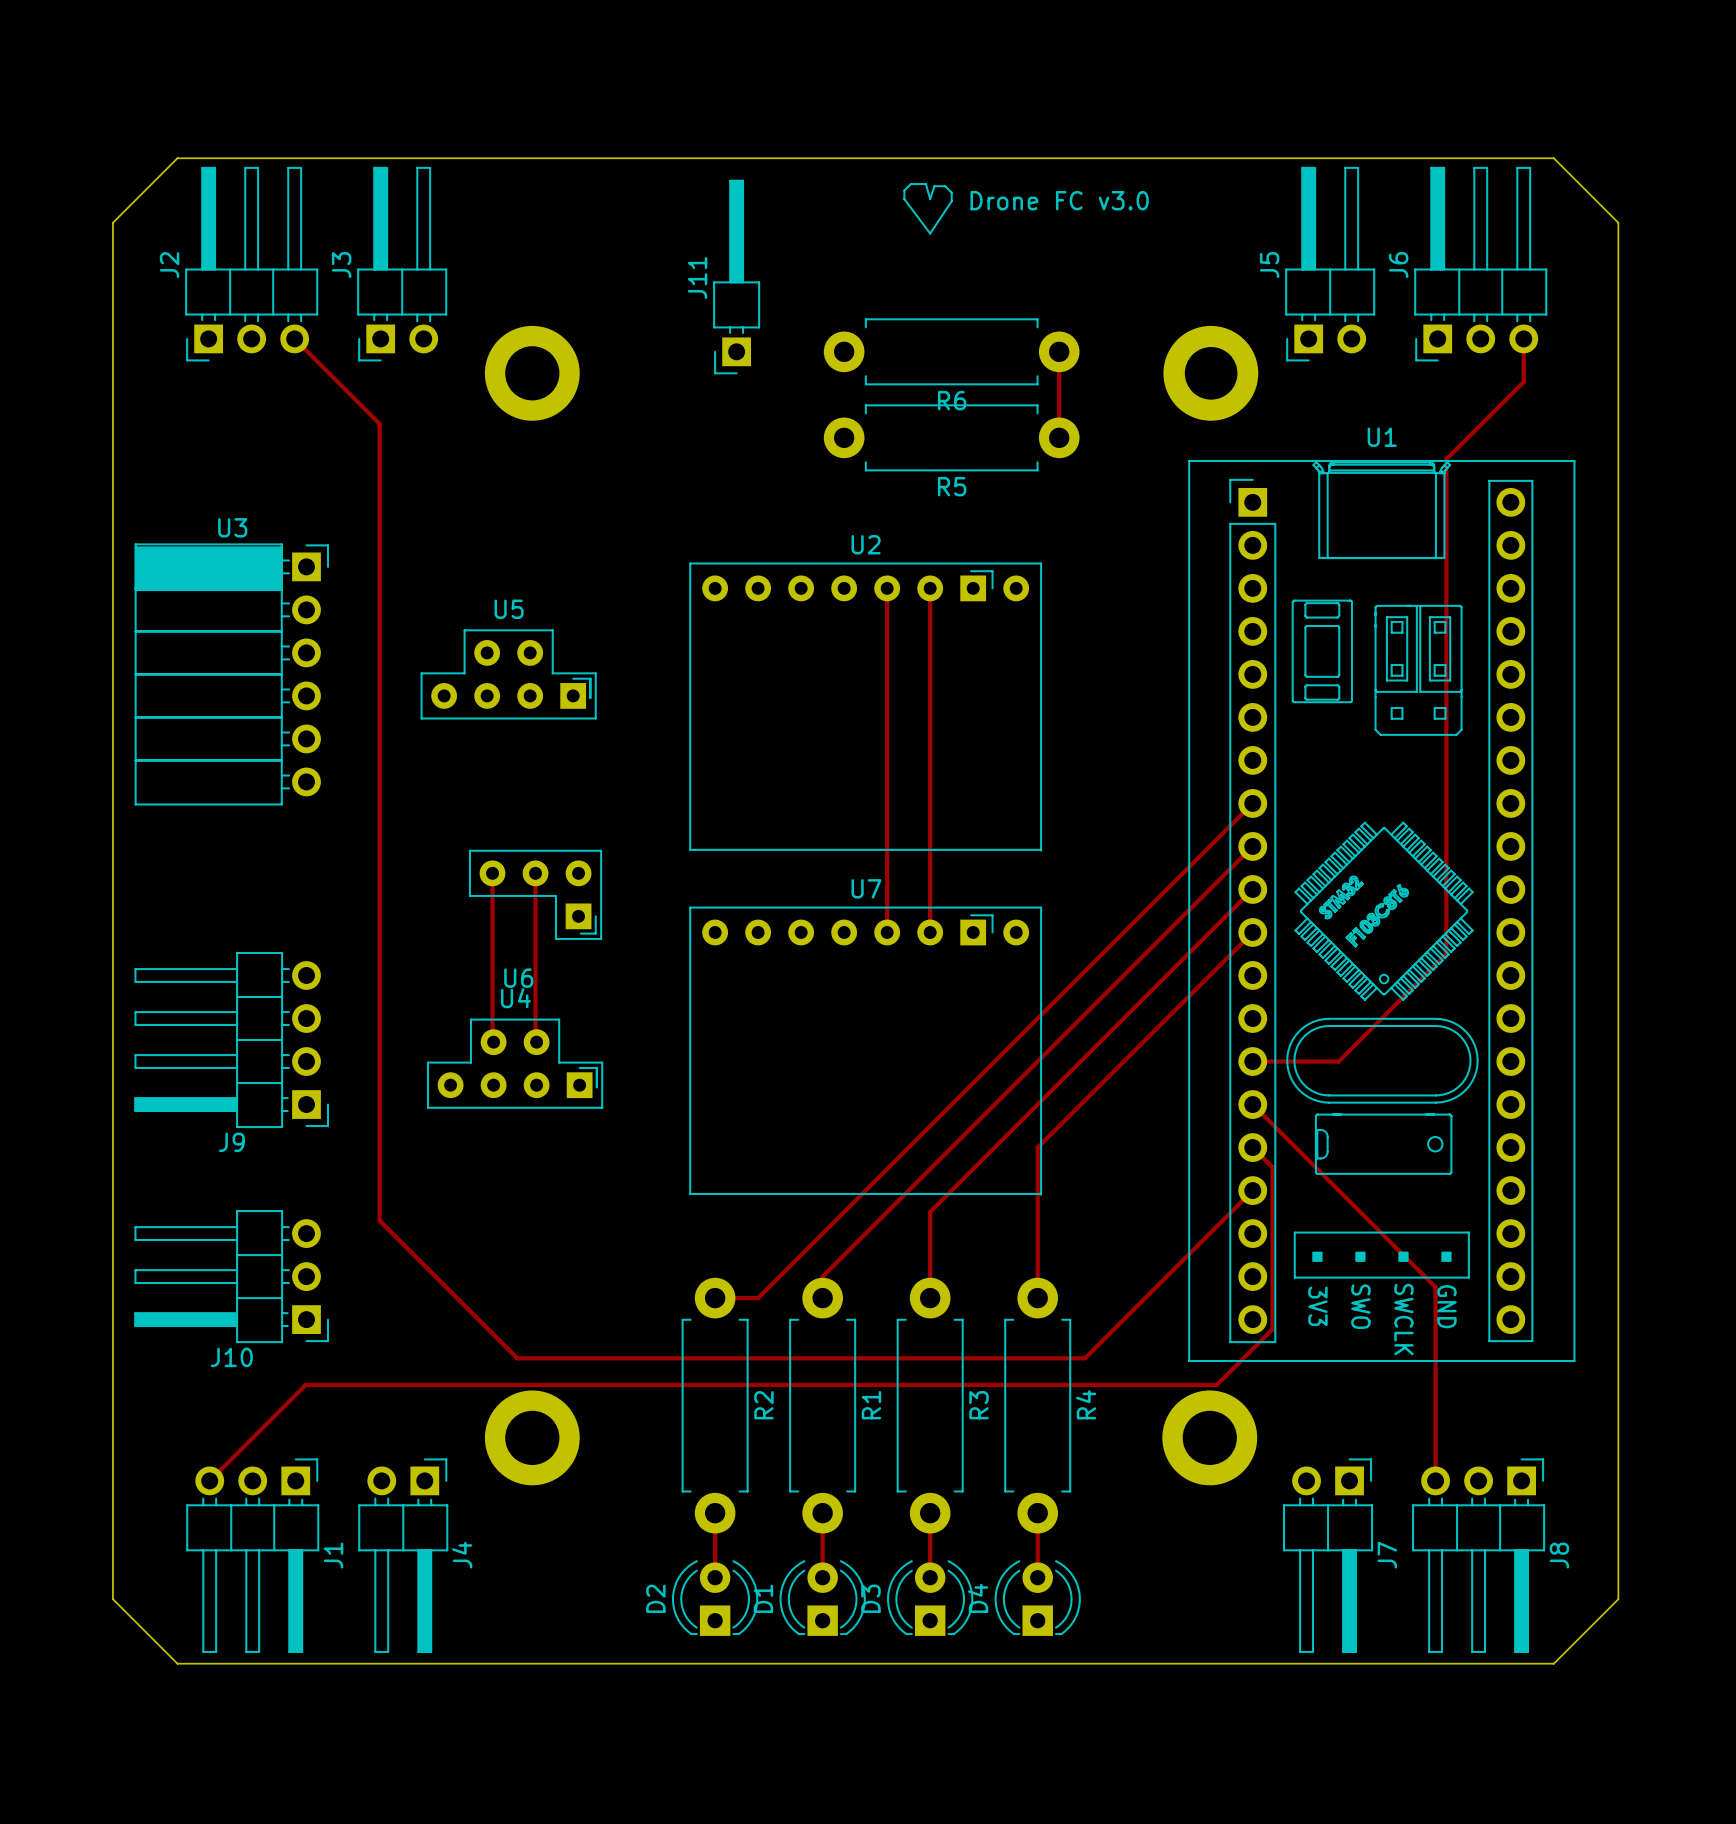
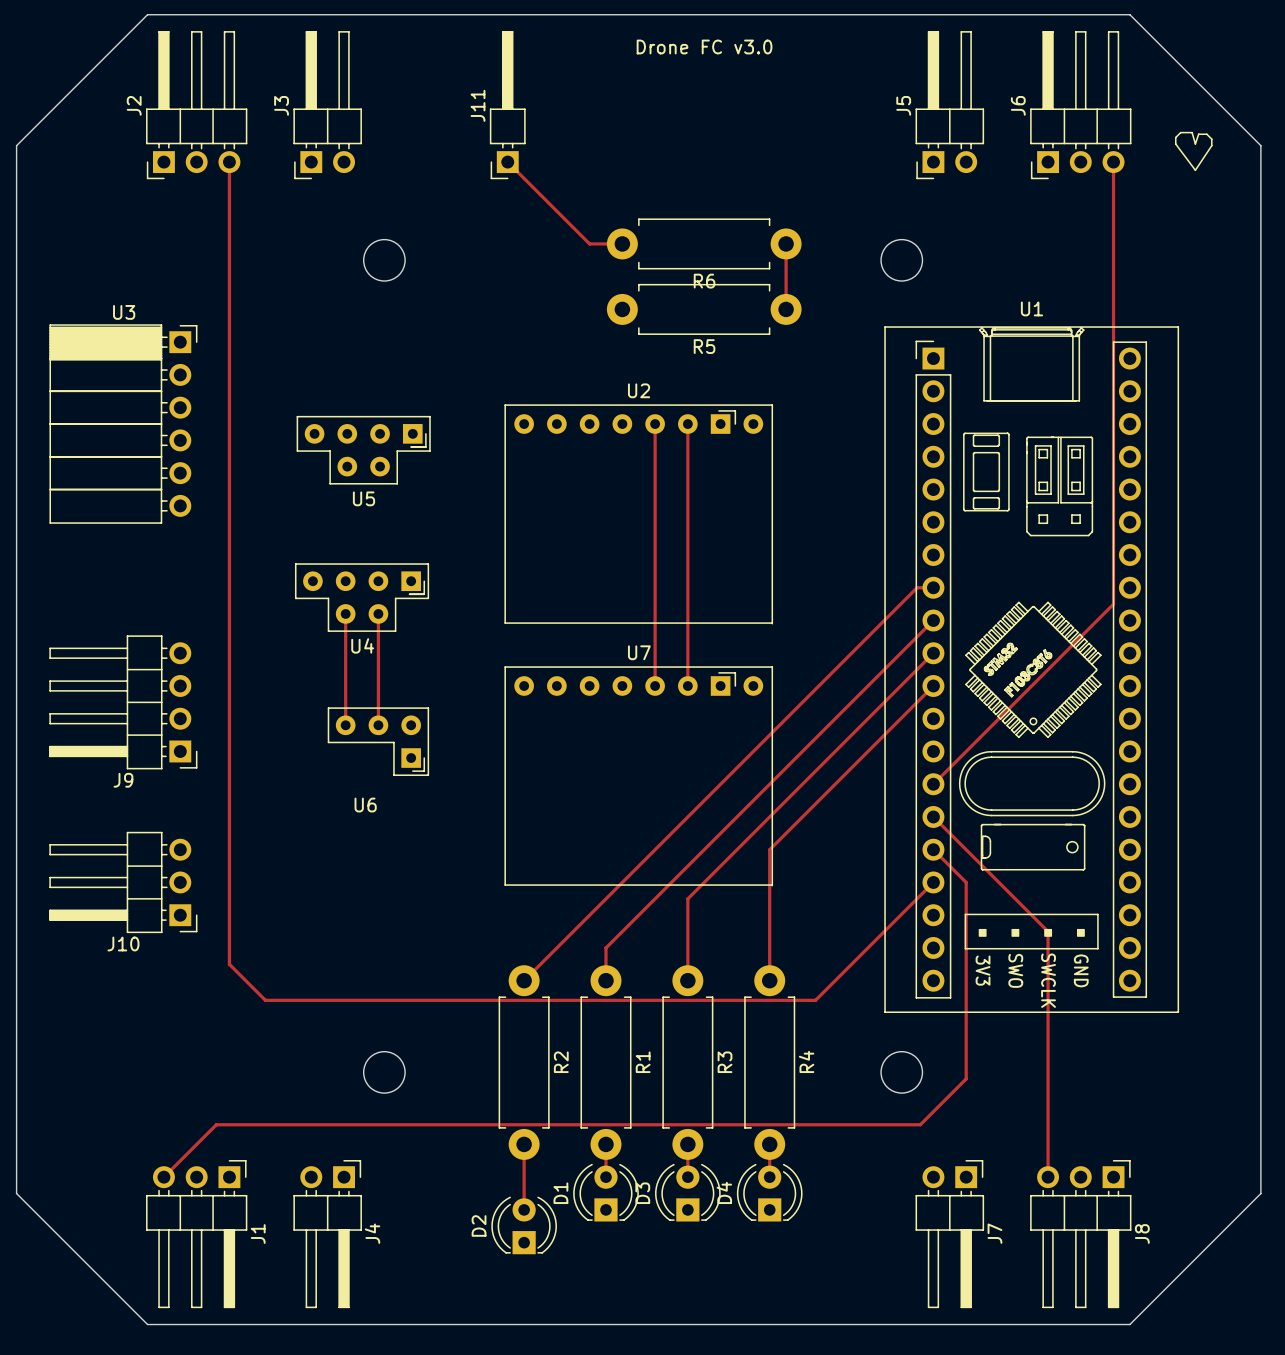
board edge: (177, 158) (112, 222) (112, 1599) (177, 1663) (1553, 1663) (1618, 1599) (1618, 222) (1553, 158) (177, 158) -> (147, 14) (16, 145) (16, 1193) (147, 1324) (1129, 1324) (1260, 1193) (1260, 145) (1129, 14) (147, 14)
line: (910, 184) (904, 190) (904, 199) (930, 233) (951, 201) (951, 192) (945, 186) (934, 186) (930, 199) (925, 184) (910, 184) -> none
text position: Drone FC v3.0 (1059, 200) -> Drone FC v3.0 (704, 46)
line: none -> (1180, 132) (1175, 137) (1175, 144) (1195, 170) (1211, 145) (1211, 139) (1206, 134) (1198, 134) (1195, 144) (1192, 132) (1180, 132)
track: none -> (507, 162) (589, 243) (622, 243)
J2 position: (251, 264) -> (196, 105)
J3 position: (402, 264) -> (327, 105)
J5 position: (1330, 264) -> (949, 105)
J6 position: (1480, 264) -> (1080, 105)
J11 position: (736, 277) -> (507, 105)
track: (294, 338) (379, 423) (379, 1220) (517, 1358) (1085, 1358) (1097, 1345) -> (229, 162) (229, 964) (265, 1000) (815, 1000)
track: (1523, 338) (1523, 381) (1446, 459) (1446, 953) (1338, 1061) (1252, 1061) -> (1113, 162) (1113, 604) (933, 784)
round board edge: none -> [363, 239, 406, 282]
part: (532, 373) -> none
part: (1210, 373) -> none
U5 name position: U5 (509, 609) -> U5 (363, 498)
U5 footprint: [420, 629, 597, 720] -> [296, 415, 431, 485]
U3 position: (231, 674) -> (123, 424)
track: (1252, 803) (758, 1298) (715, 1298) -> (933, 587) (917, 587) (524, 980)
track: none -> (345, 613) (345, 725)
track: none -> (378, 613) (378, 725)
track: (492, 873) (493, 1042) -> none
track: (535, 873) (536, 1042) -> none
U6 position: (535, 894) -> (378, 741)
U4 name position: U4 (515, 998) -> U4 (362, 645)
U4 footprint: [427, 1018, 604, 1109] -> [294, 563, 430, 632]
J9 position: (231, 1040) -> (123, 702)
track: (1272, 1167) (1272, 1329) (1216, 1384) (305, 1384) (209, 1480) -> (948, 864) (966, 882) (966, 1078) (920, 1124) (216, 1124) (163, 1177)
track: (1403, 1255) (1435, 1287) (1435, 1480) -> (1048, 931) (1048, 1177)
J10 position: (231, 1276) -> (123, 882)
R2 position: (715, 1405) -> (524, 1062)
R1 position: (822, 1405) -> (605, 1062)
R3 position: (930, 1405) -> (687, 1062)
R4 position: (1037, 1405) -> (769, 1062)
round board edge: none -> [363, 1051, 406, 1094]
round board edge: none -> [880, 1051, 923, 1094]
part: (532, 1437) -> none
part: (1209, 1437) -> none
J1 position: (252, 1555) -> (196, 1234)
J4 position: (403, 1555) -> (327, 1234)
J7 position: (1328, 1555) -> (949, 1234)
J8 position: (1478, 1555) -> (1080, 1234)
track: none -> (524, 1177) (524, 1209)
D2 position: (715, 1598) -> (524, 1225)

